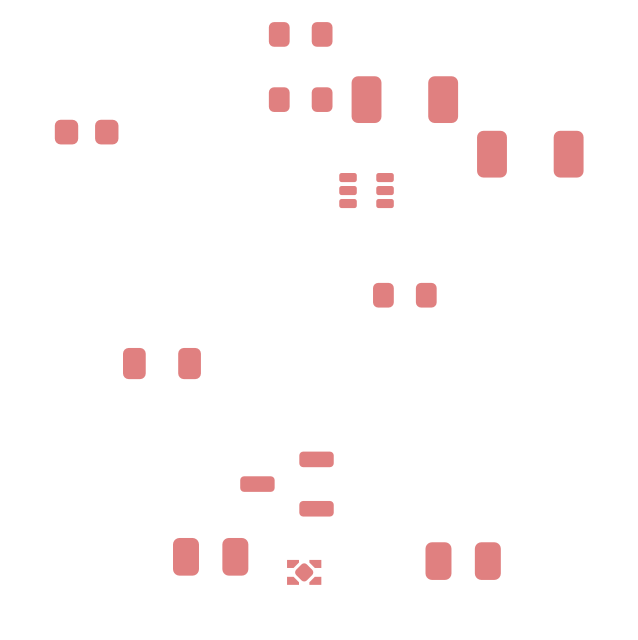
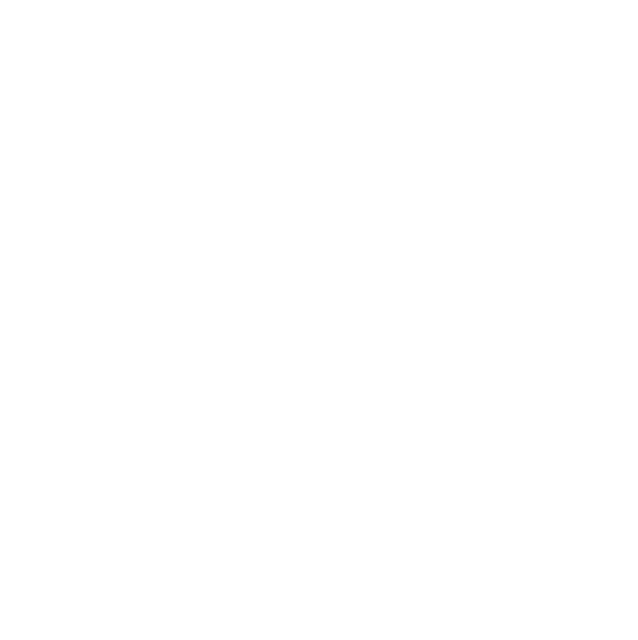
part: (300, 34) -> none
part: (300, 99) -> none
part: (404, 99) -> none
part: (86, 132) -> none
part: (530, 154) -> none
part: (366, 190) -> none
part: (404, 295) -> none
part: (161, 363) -> none
part: (286, 484) -> none
part: (210, 556) -> none
part: (463, 561) -> none
part: (304, 572) -> none

